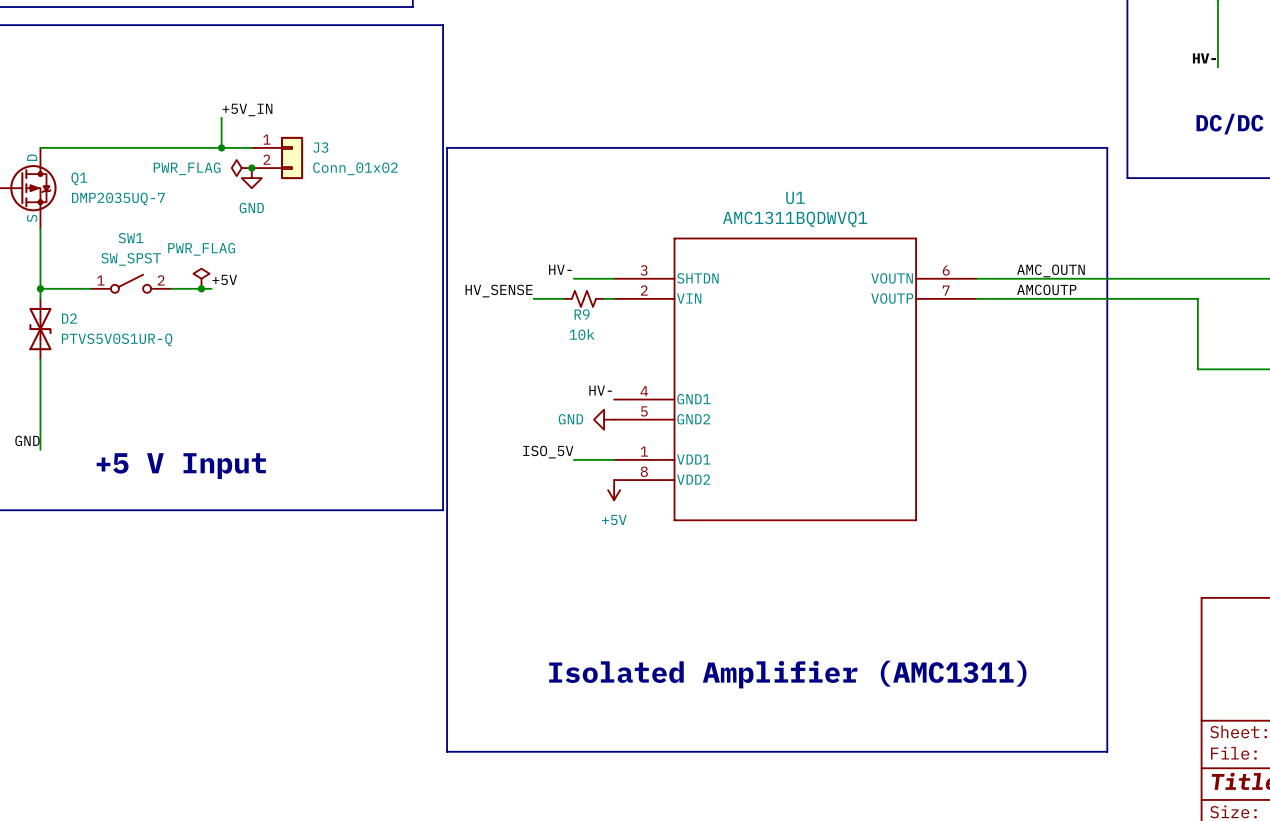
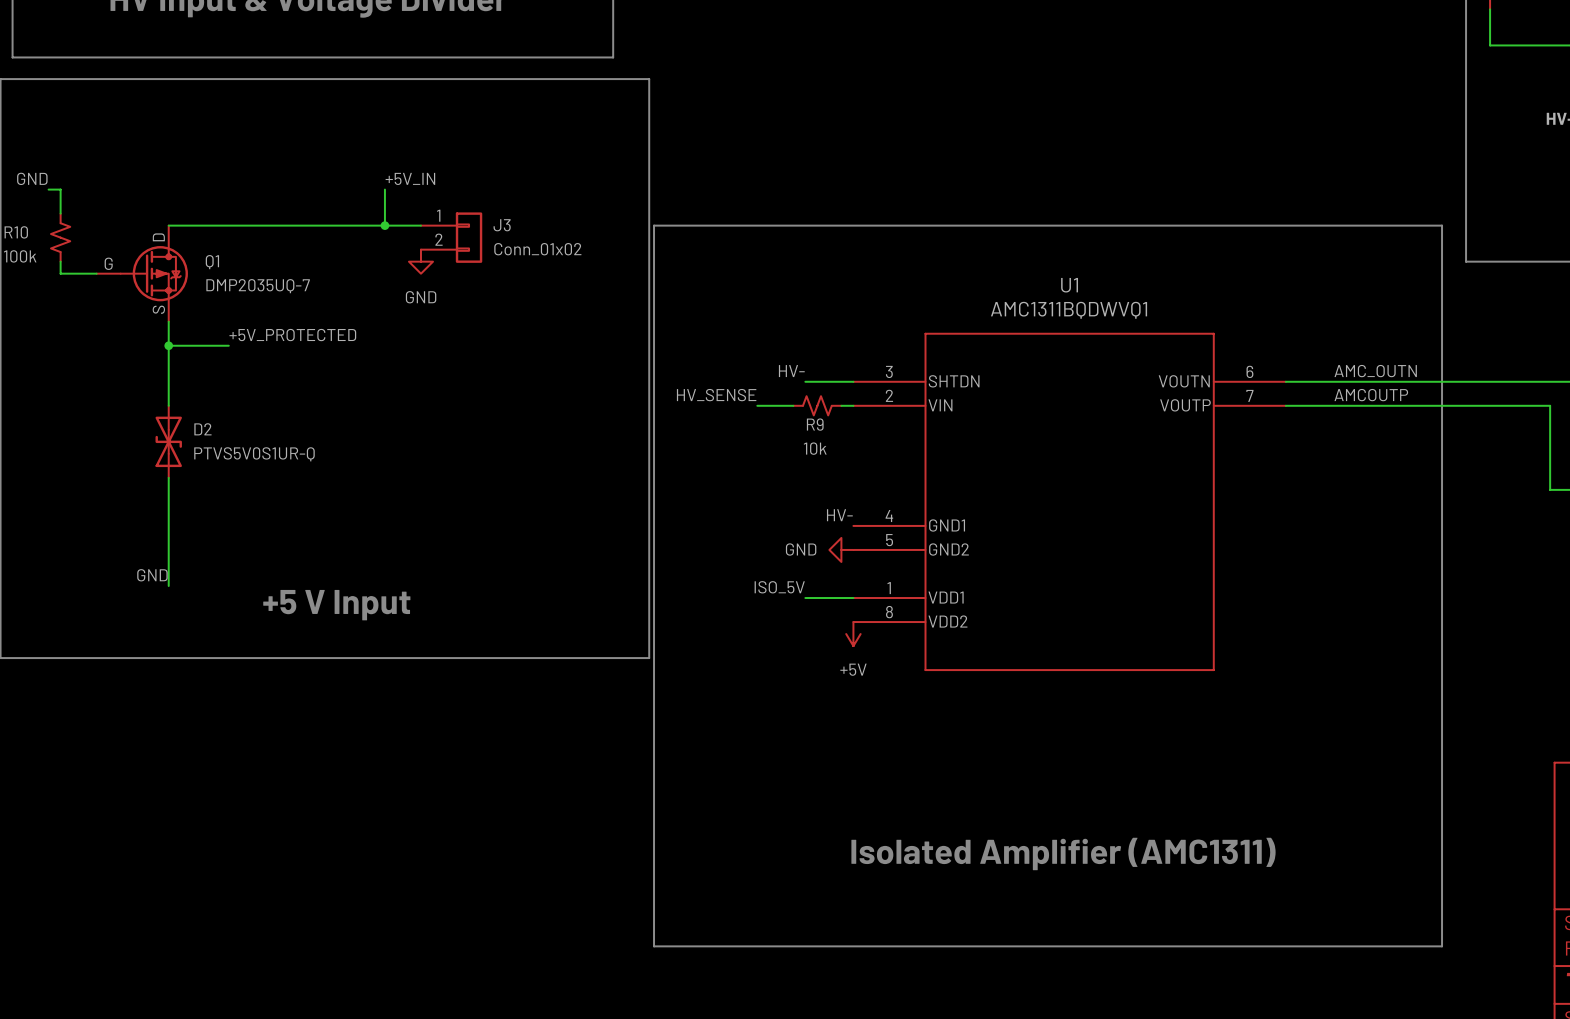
power symbol: PWR_FLAG (241, 168) -> none
junction: (251, 168) -> none
label: none -> +5V_PROTECTED (292, 335)
power symbol: PWR_FLAG (201, 278) -> none
label: +5V (224, 279) -> none
SW1: SW_SPST (131, 283) -> none
wire: (40, 288) (90, 288) -> (168, 345) (228, 345)
junction position: (40, 288) -> (168, 345)
wire: (171, 288) (211, 288) -> none
junction: (201, 288) -> none

